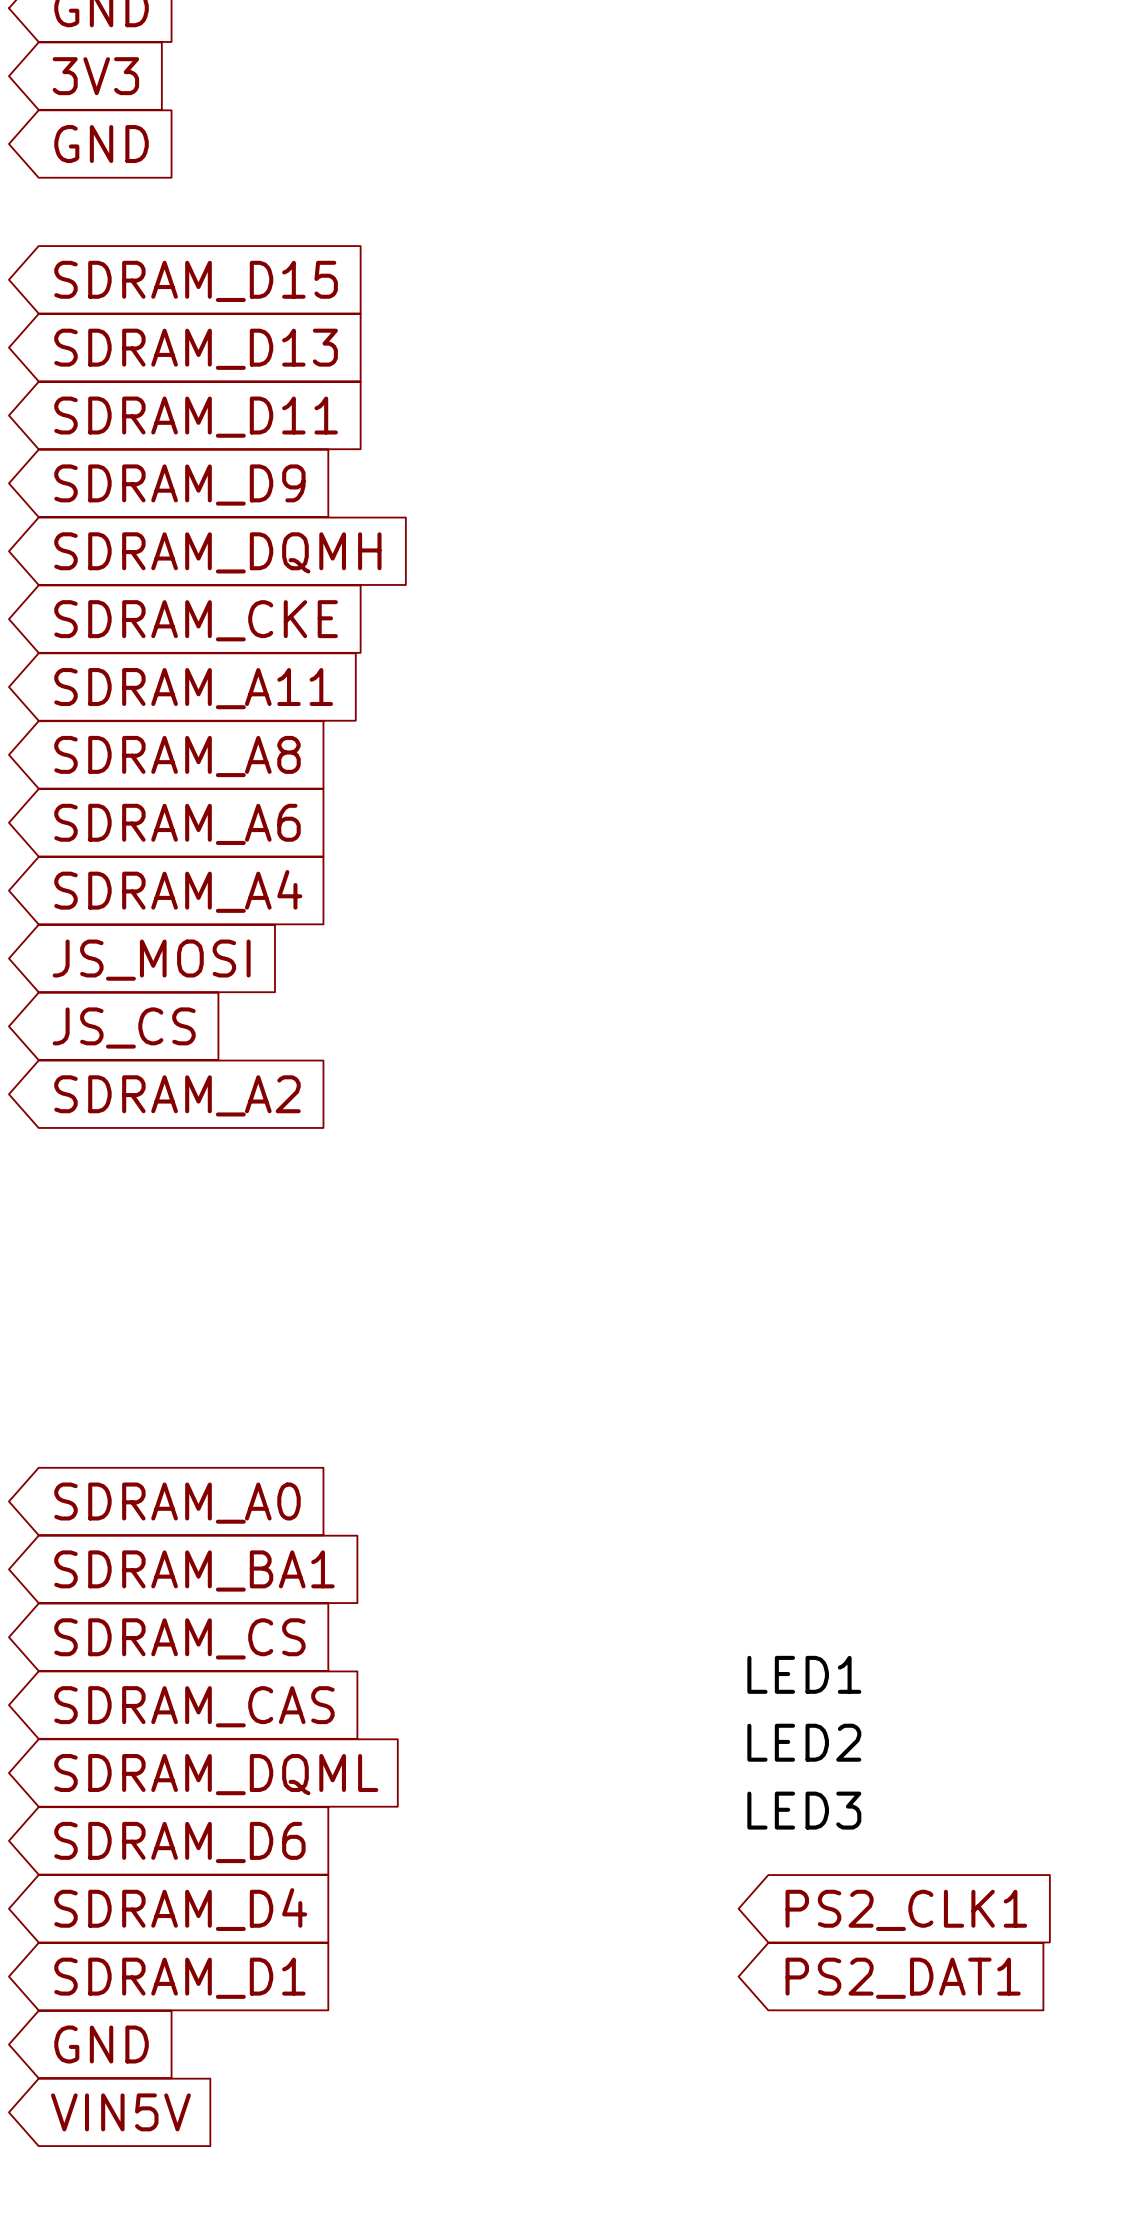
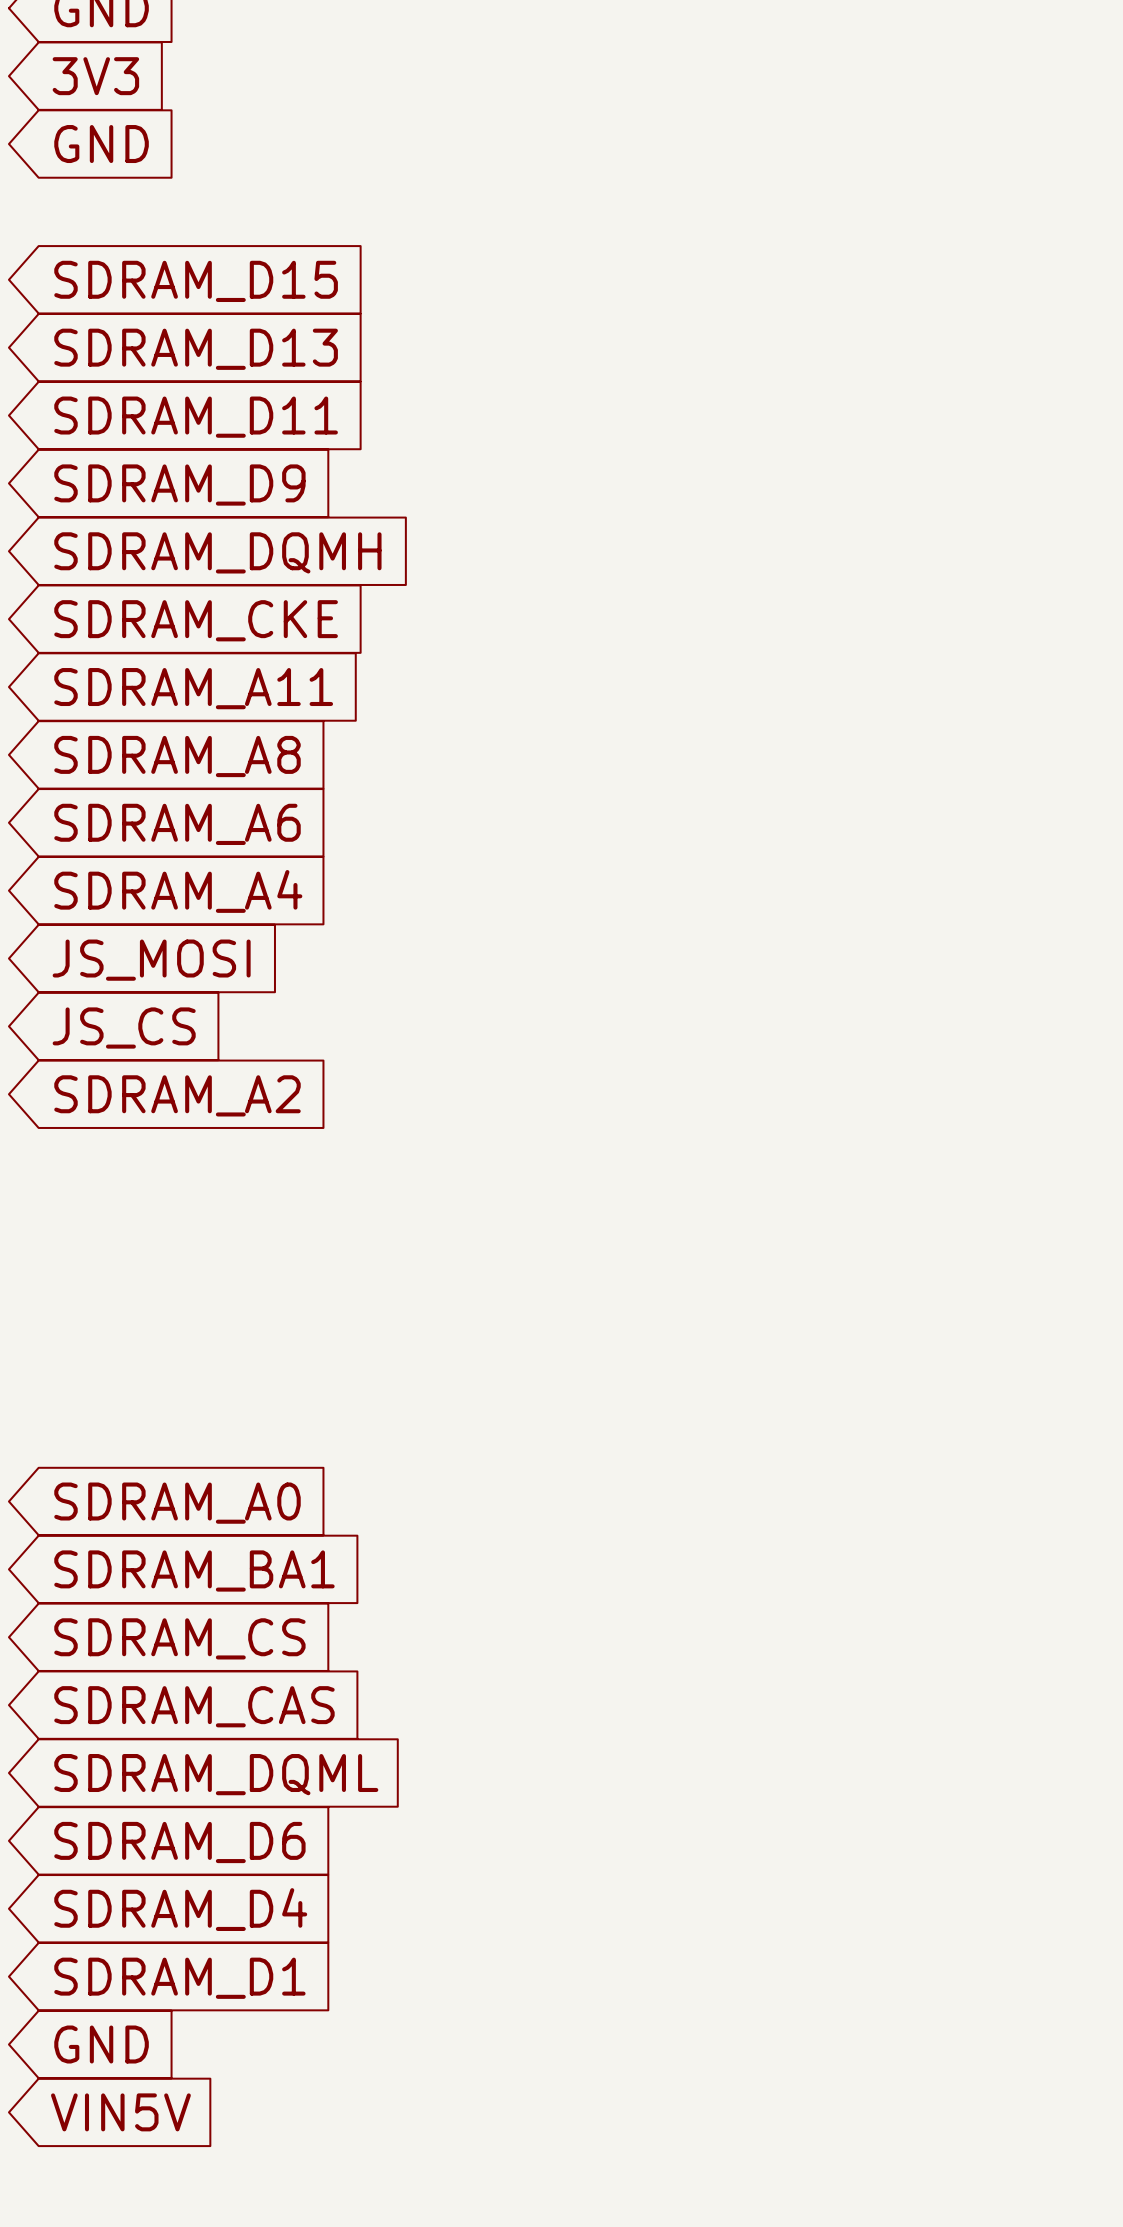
label: LED1 (804, 1674) -> none
label: LED2 (804, 1742) -> none
label: LED3 (804, 1810) -> none
global label: PS2_CLK1 (906, 1910) -> none
global label: PS2_DAT1 (903, 1978) -> none

